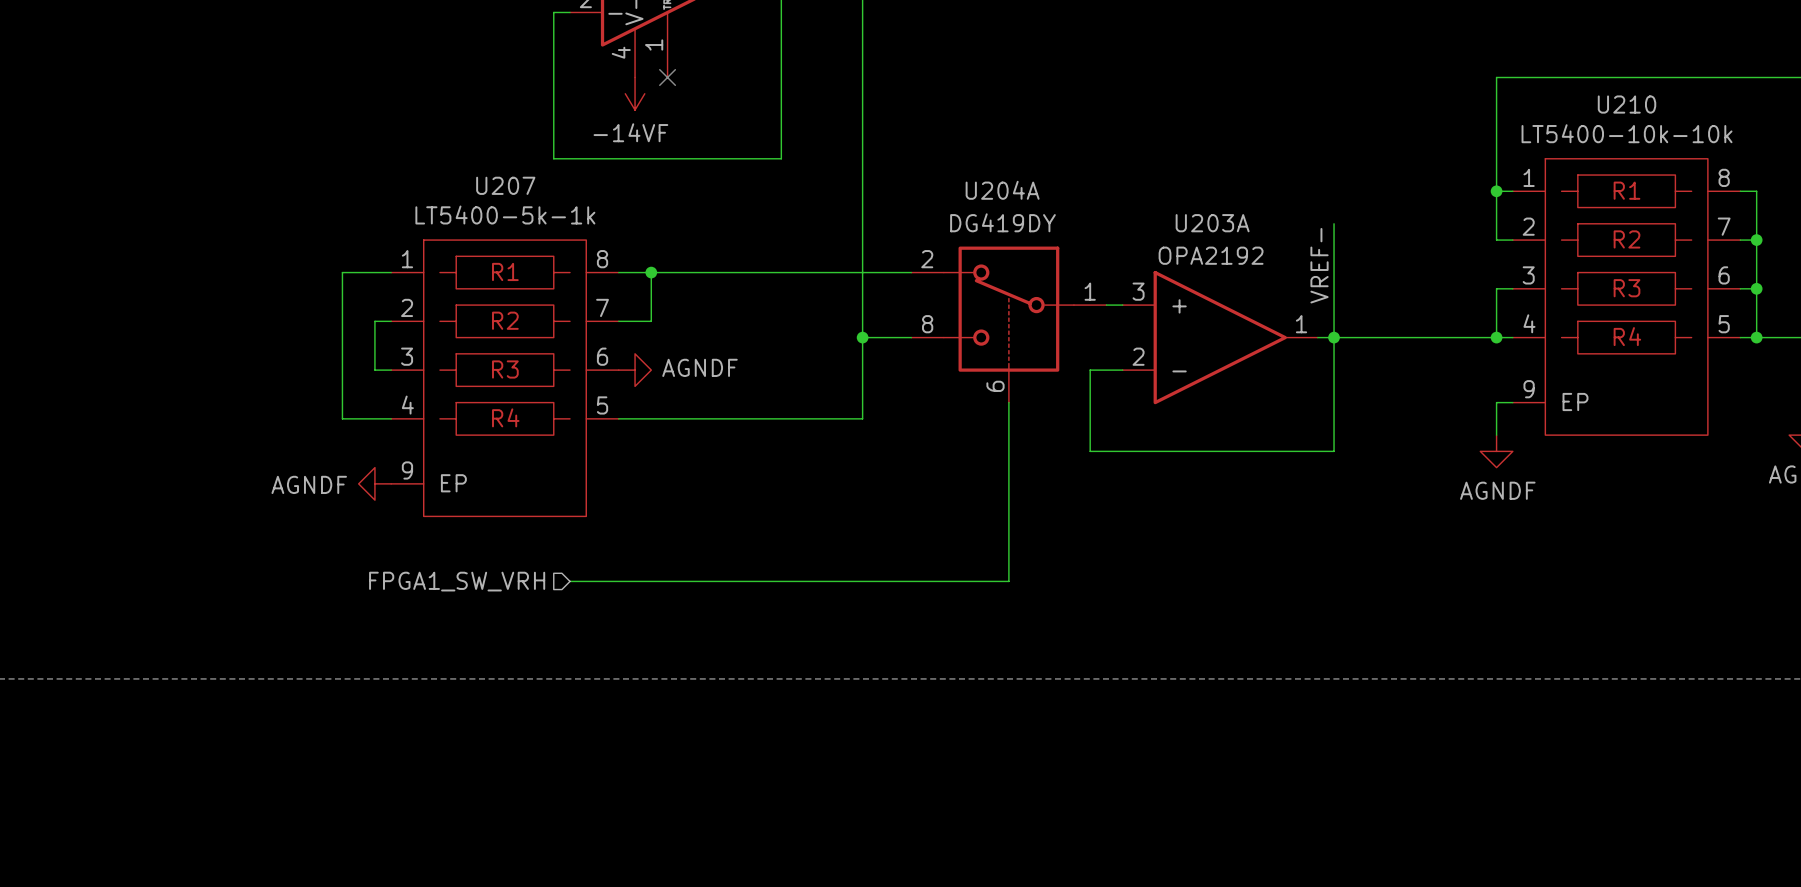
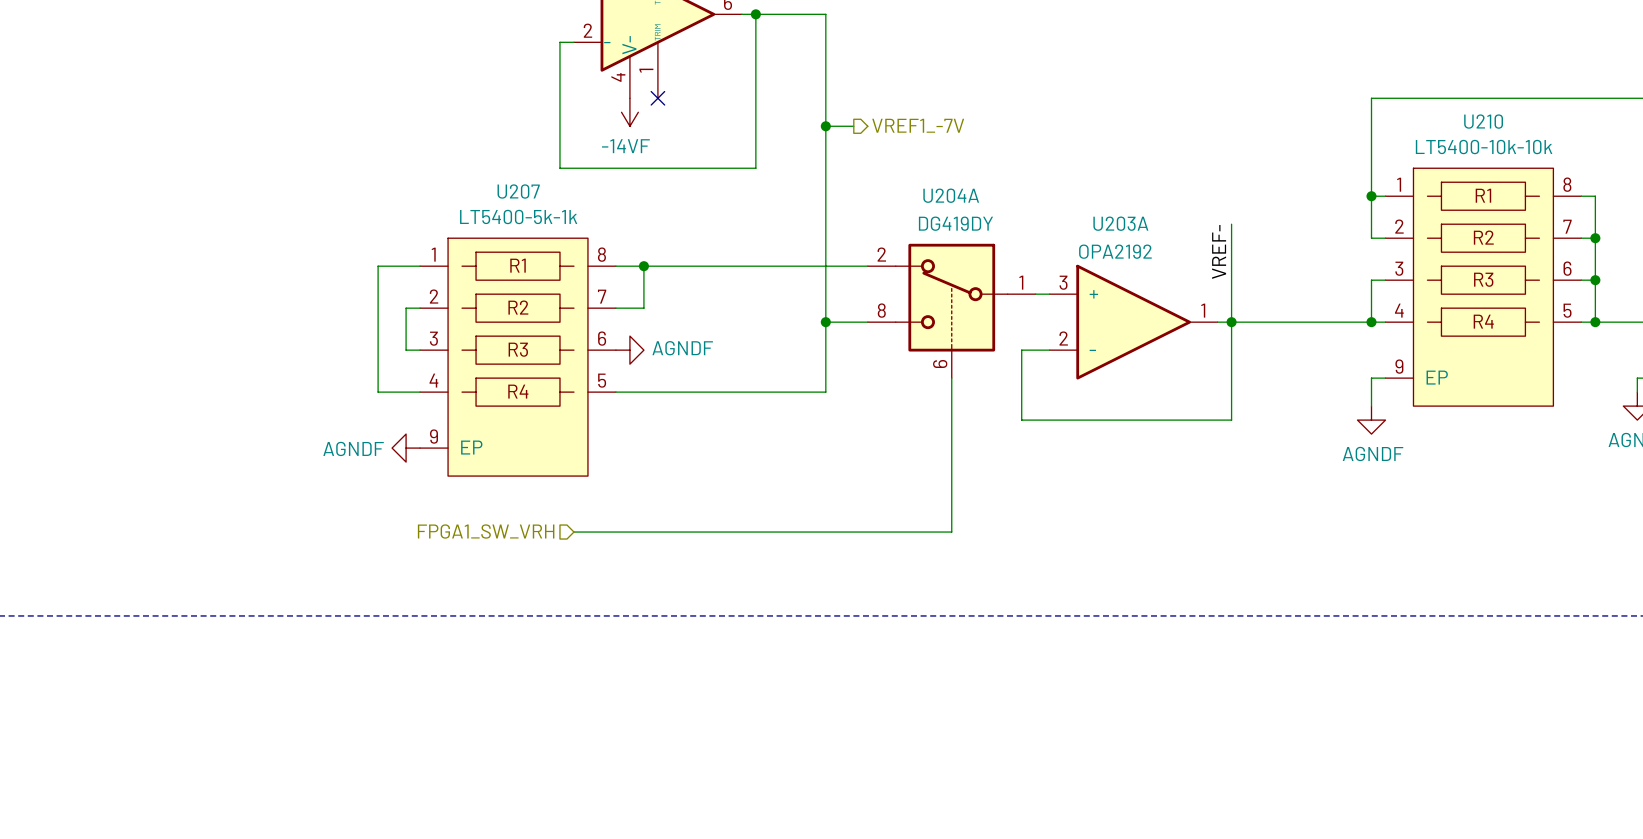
wire: none -> (825, 126) (853, 126)
junction: none -> (825, 126)
hierarchical label: none -> VREF1_-7V (918, 125)

